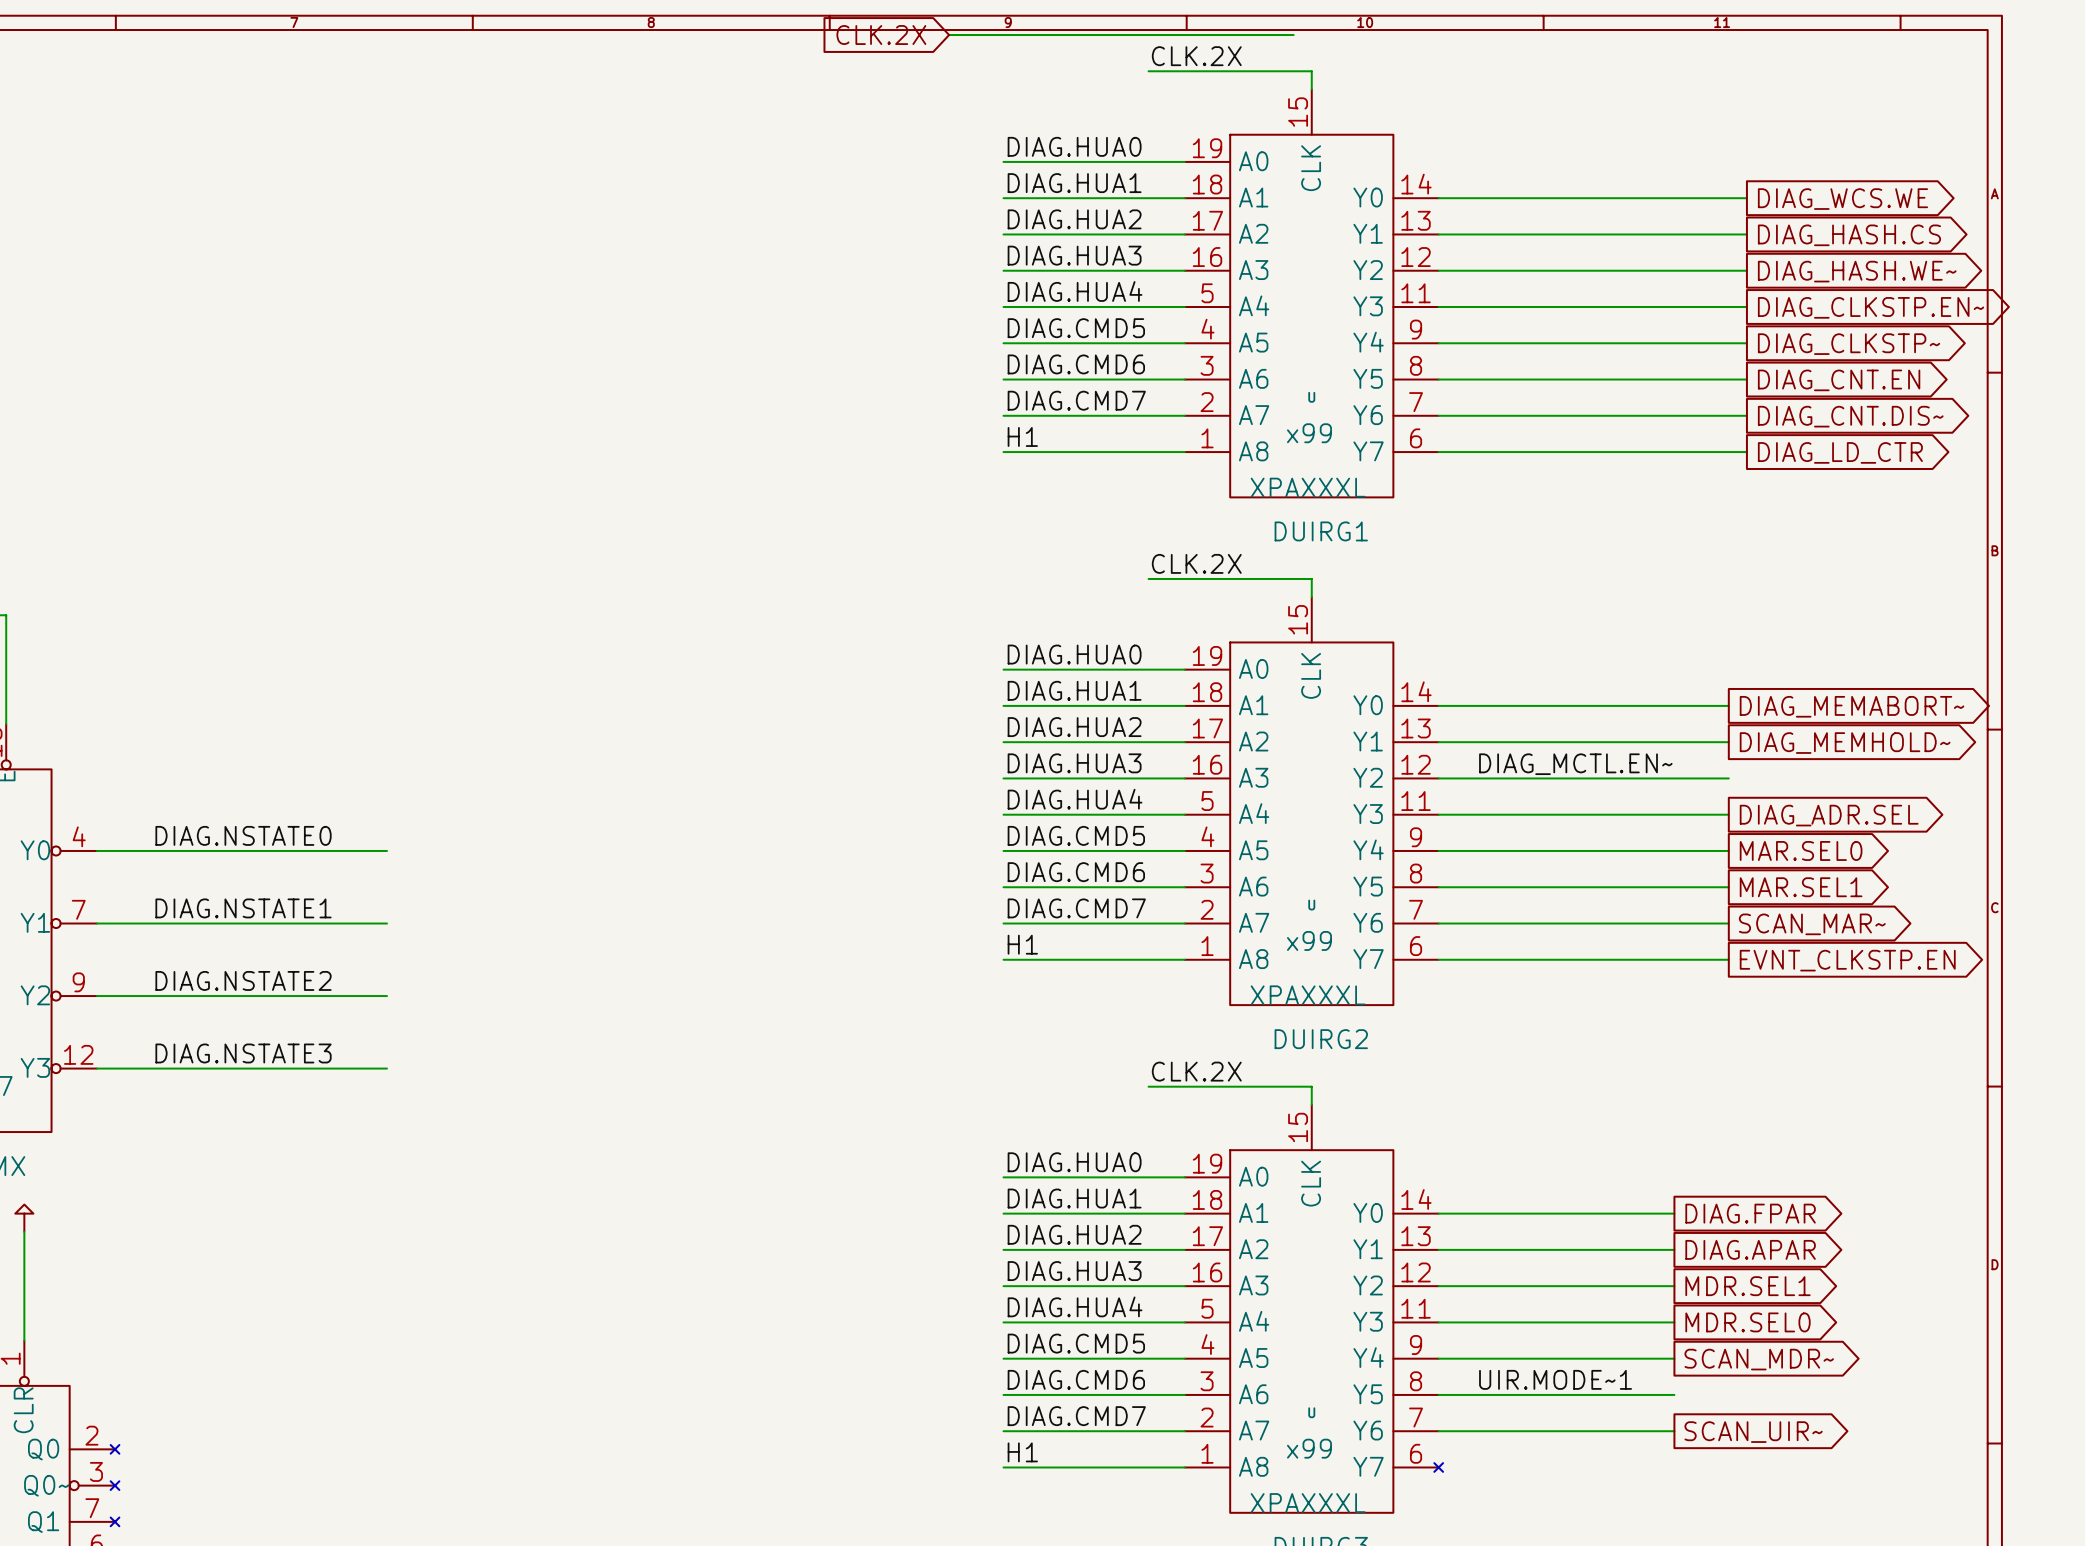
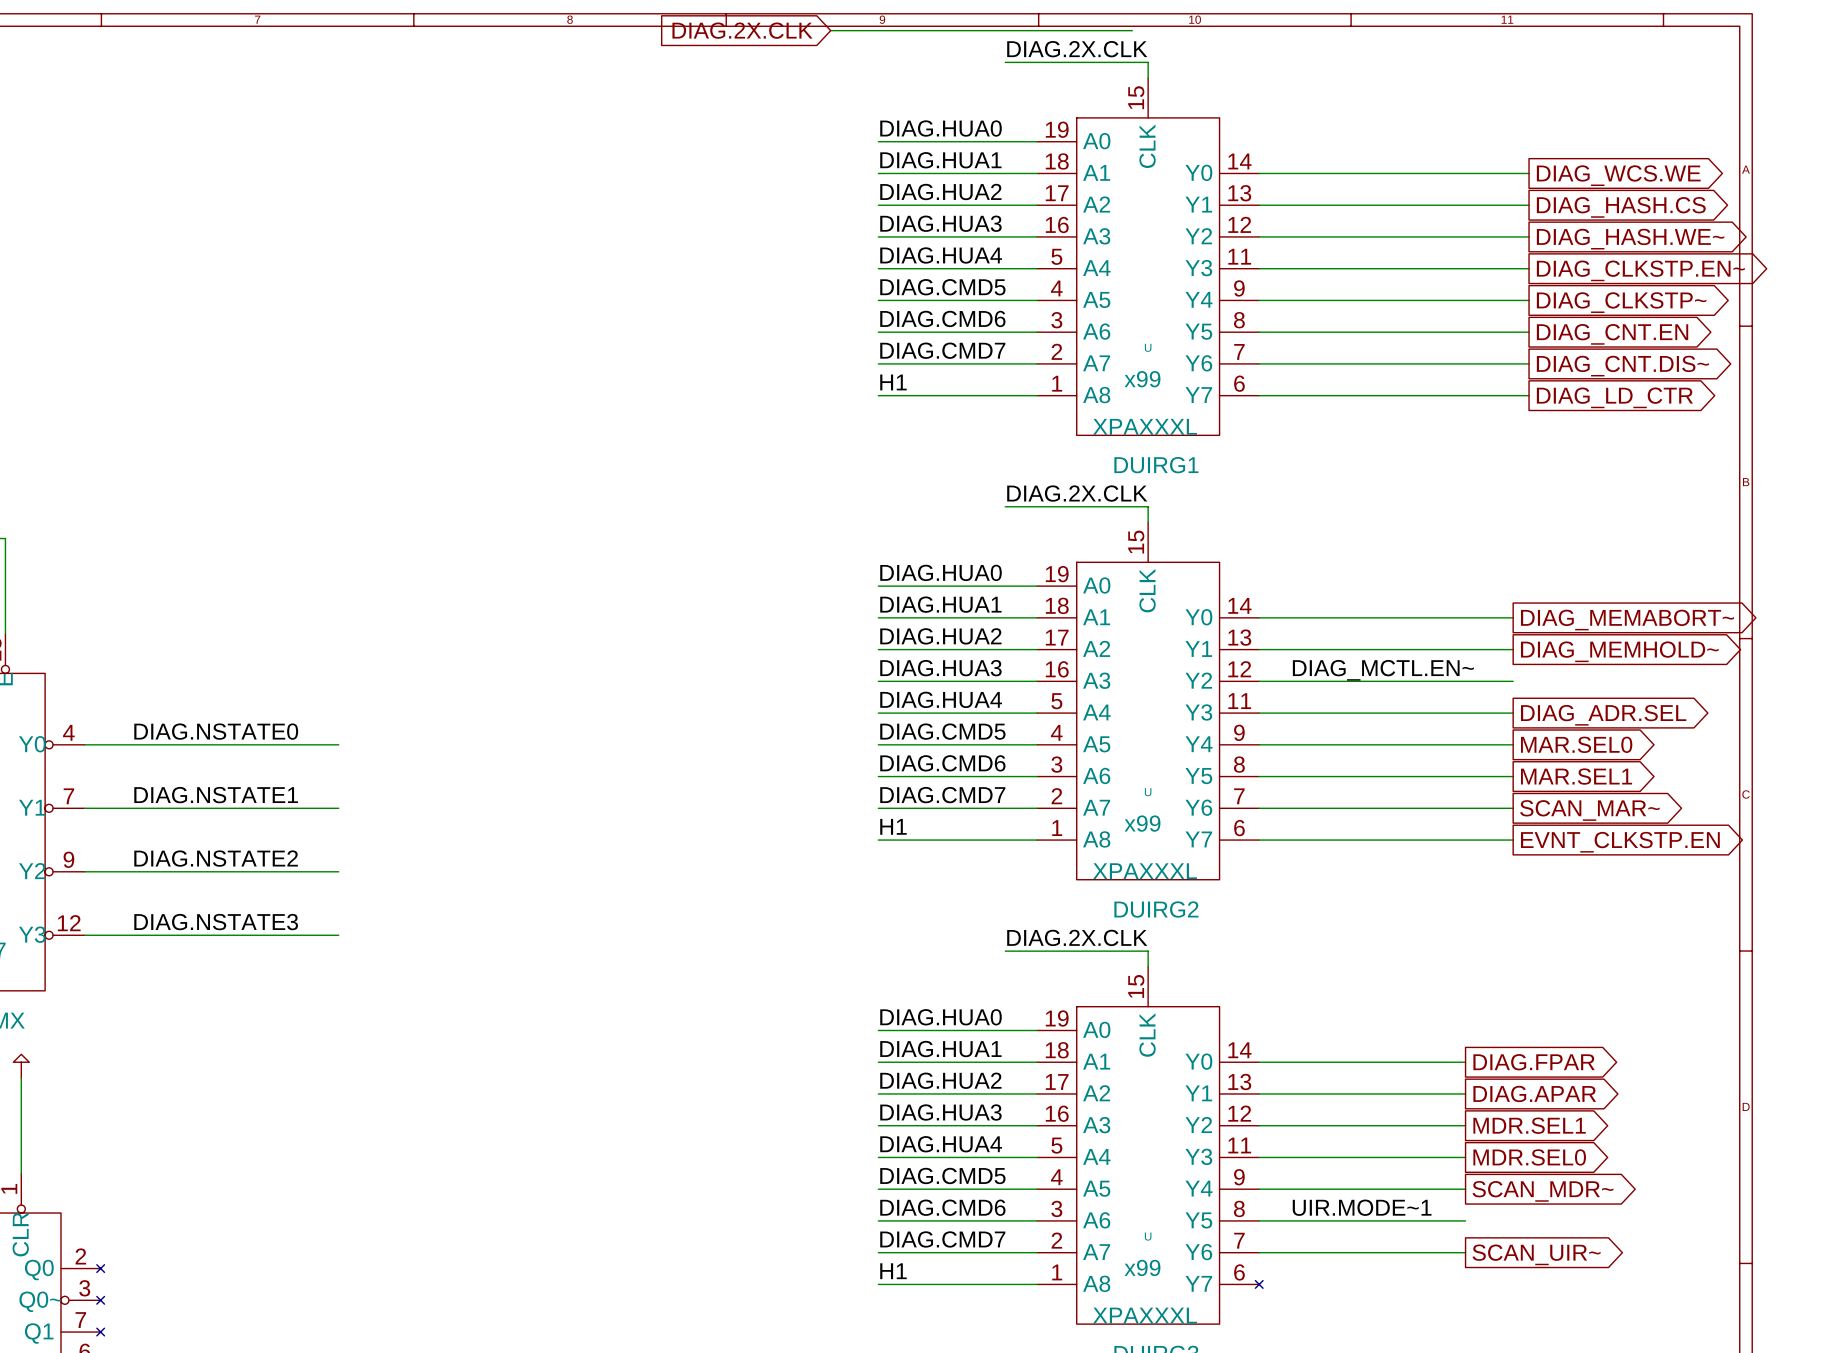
global label: CLK.2X (881, 35) -> DIAG.2X.CLK (742, 30)
label: CLK.2X (1196, 56) -> DIAG.2X.CLK (1077, 49)
label: CLK.2X (1196, 563) -> DIAG.2X.CLK (1077, 493)
label: CLK.2X (1196, 1071) -> DIAG.2X.CLK (1077, 937)

